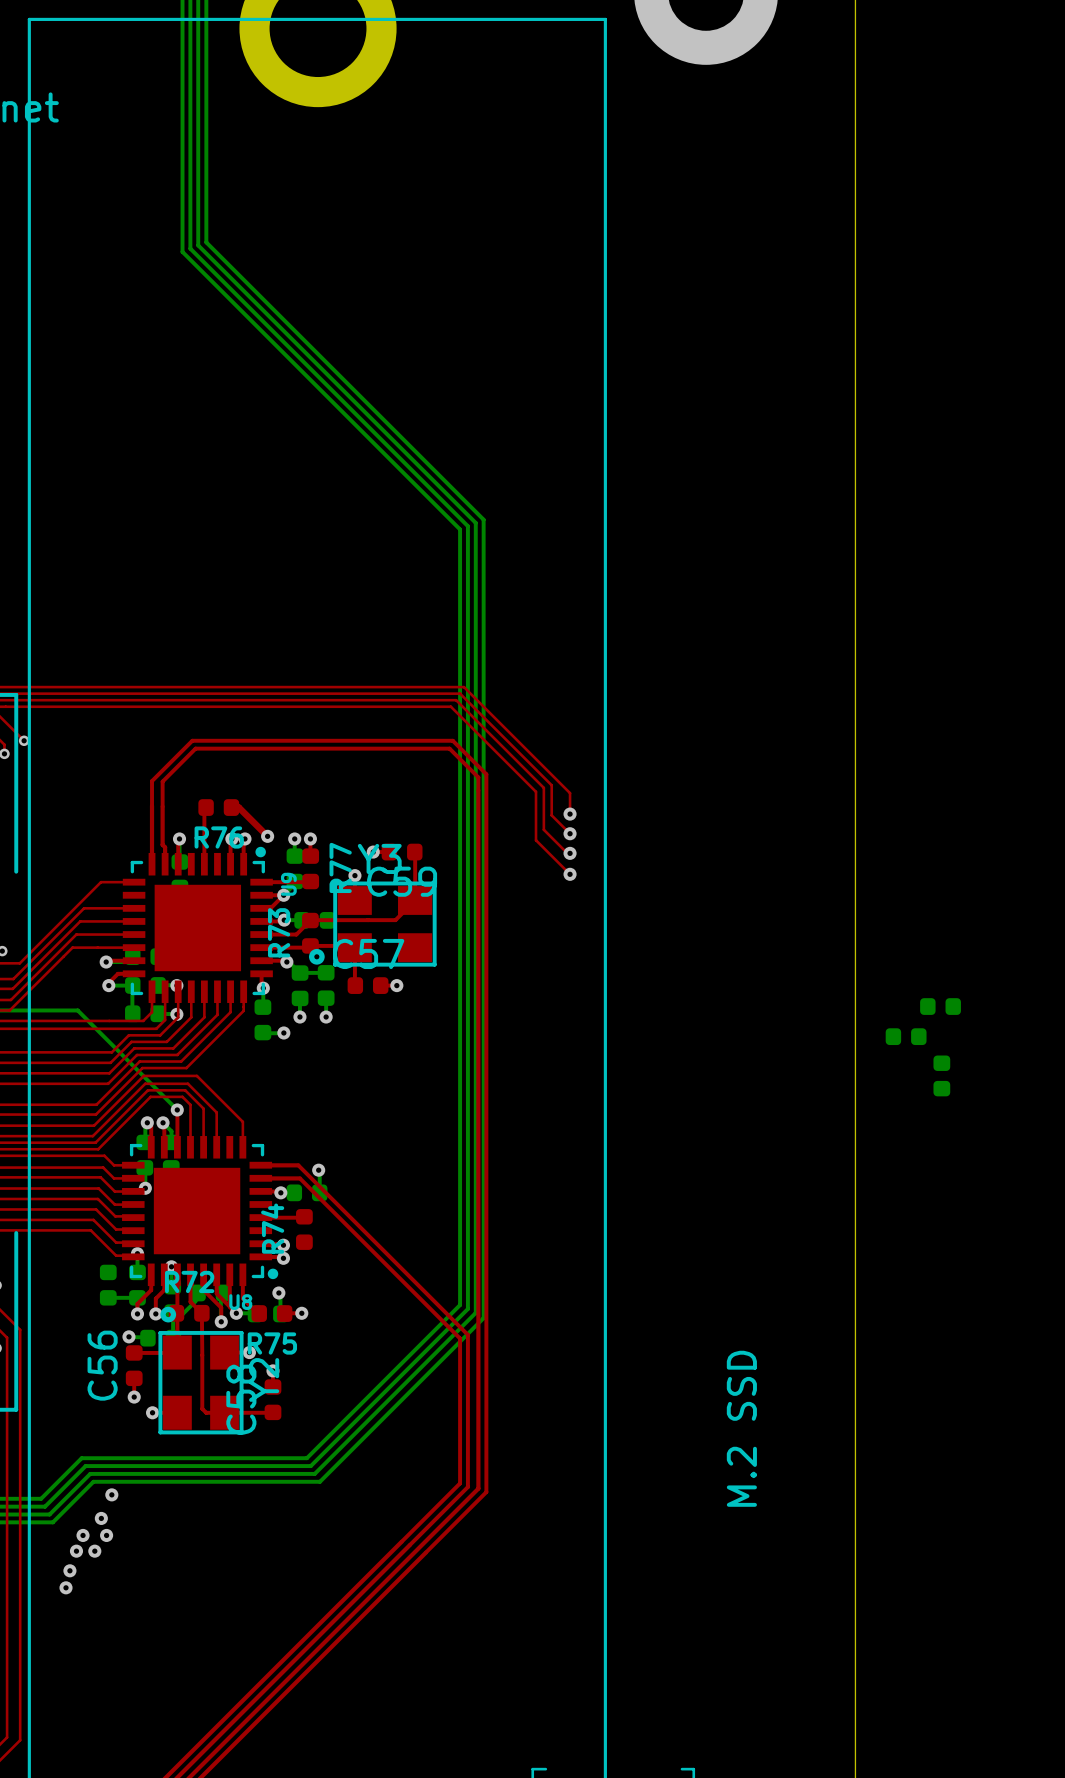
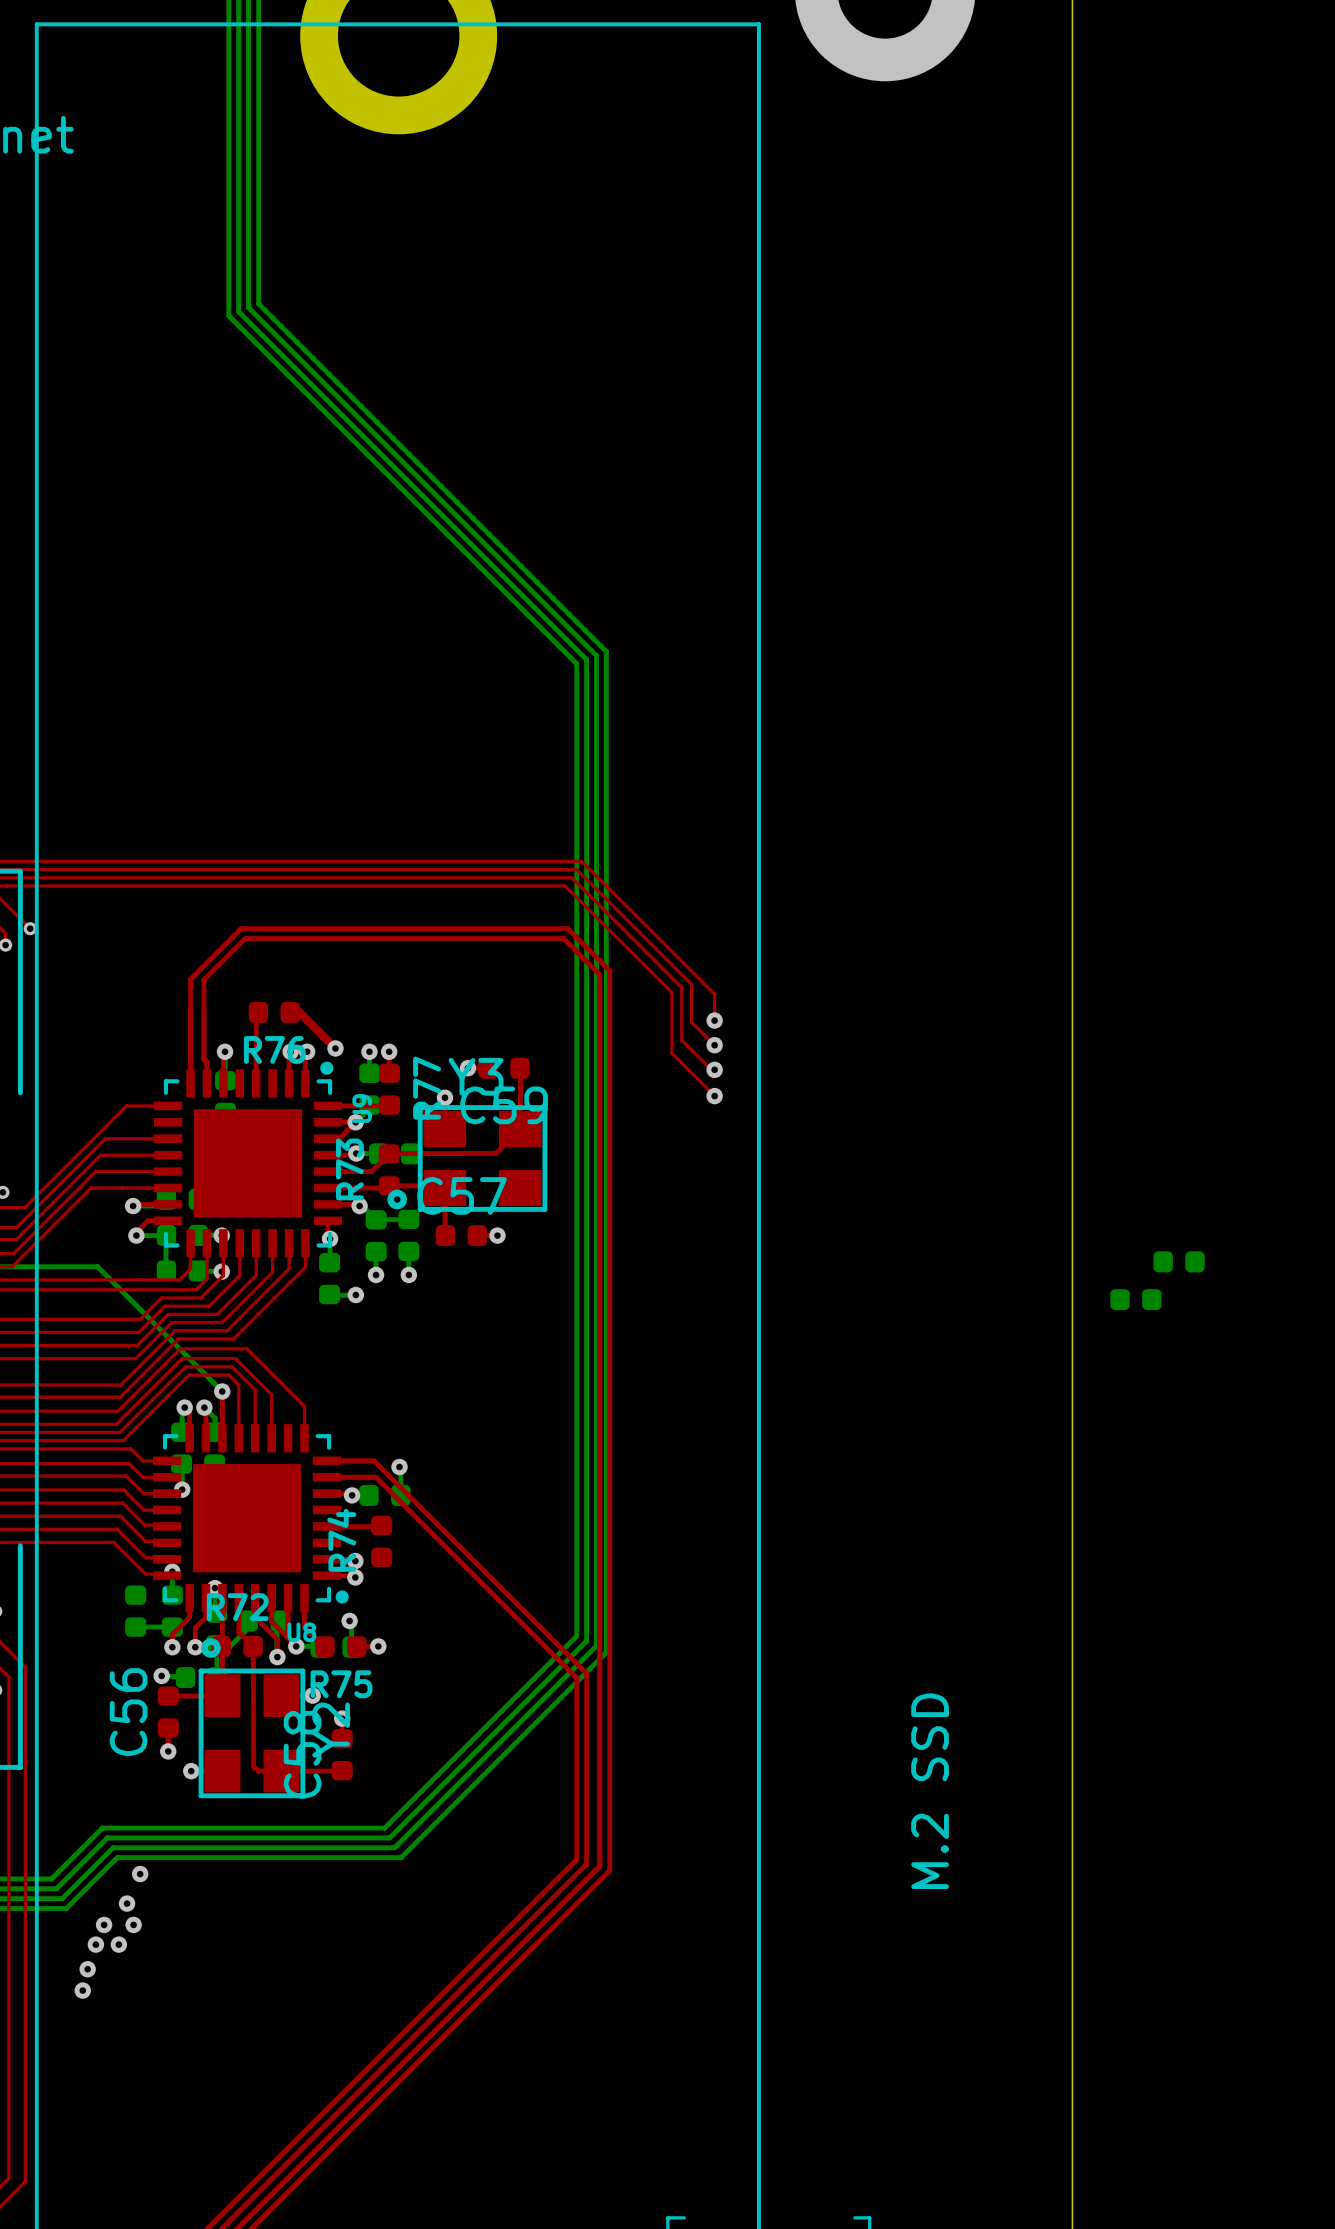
part: (941, 1075) -> none

